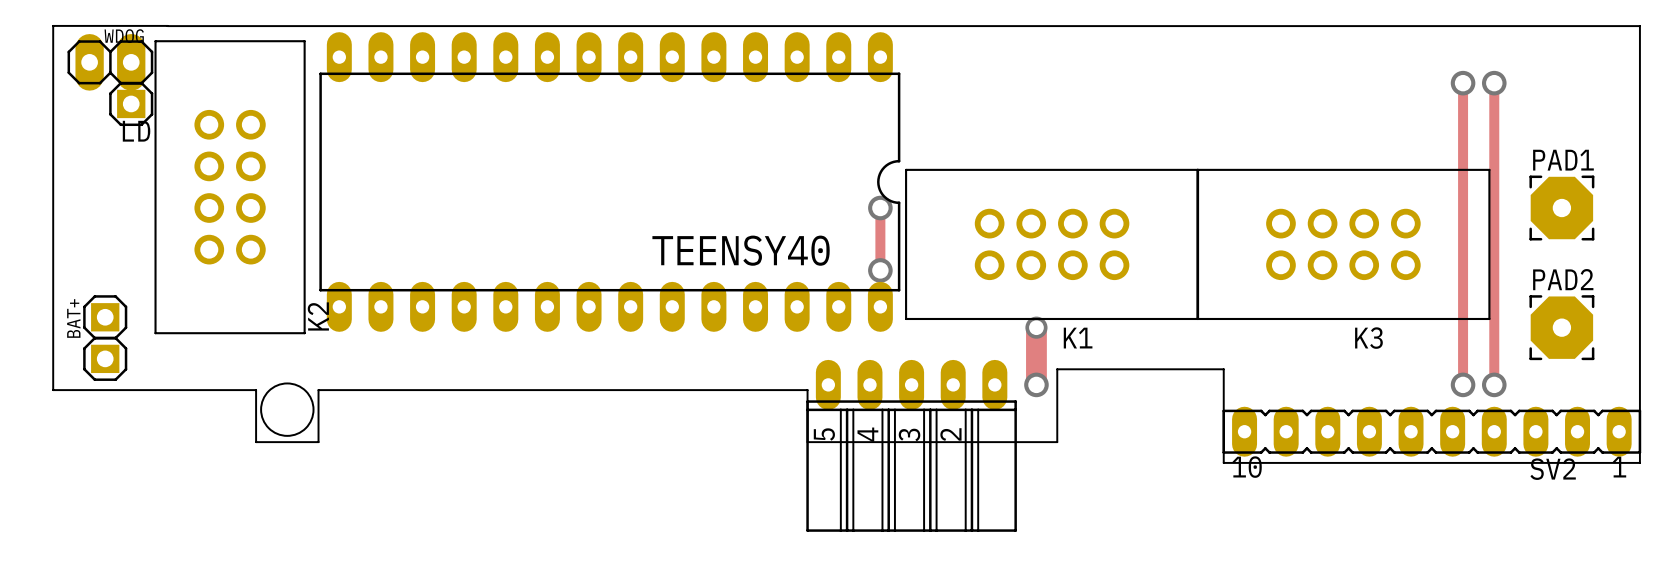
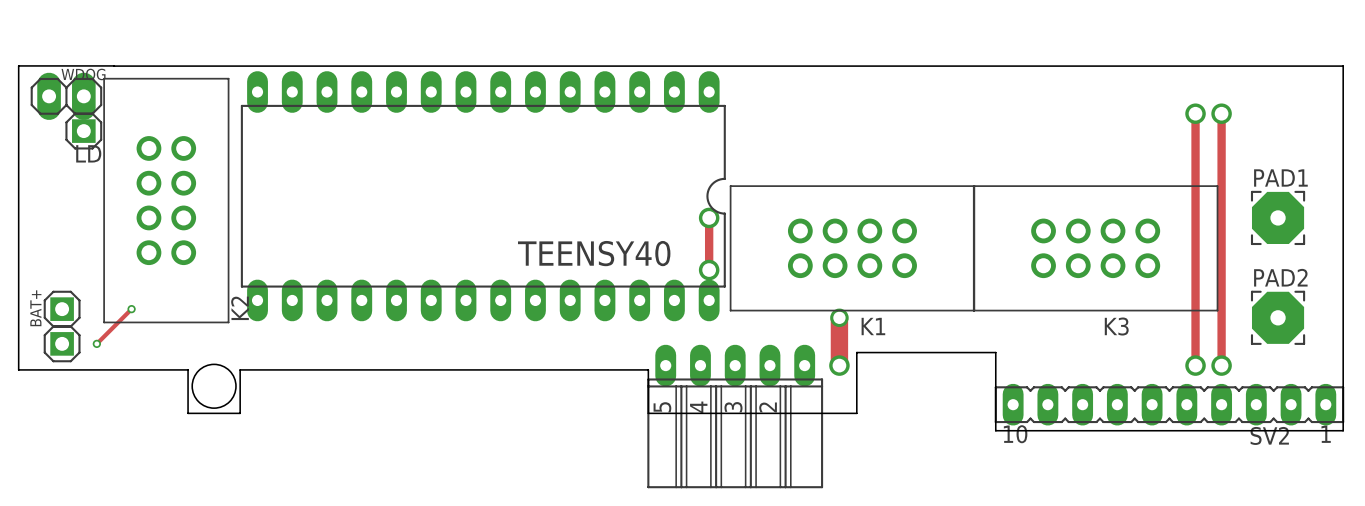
track: none -> (131, 309) (96, 343)
via: none -> (131, 309)
via: none -> (96, 343)

